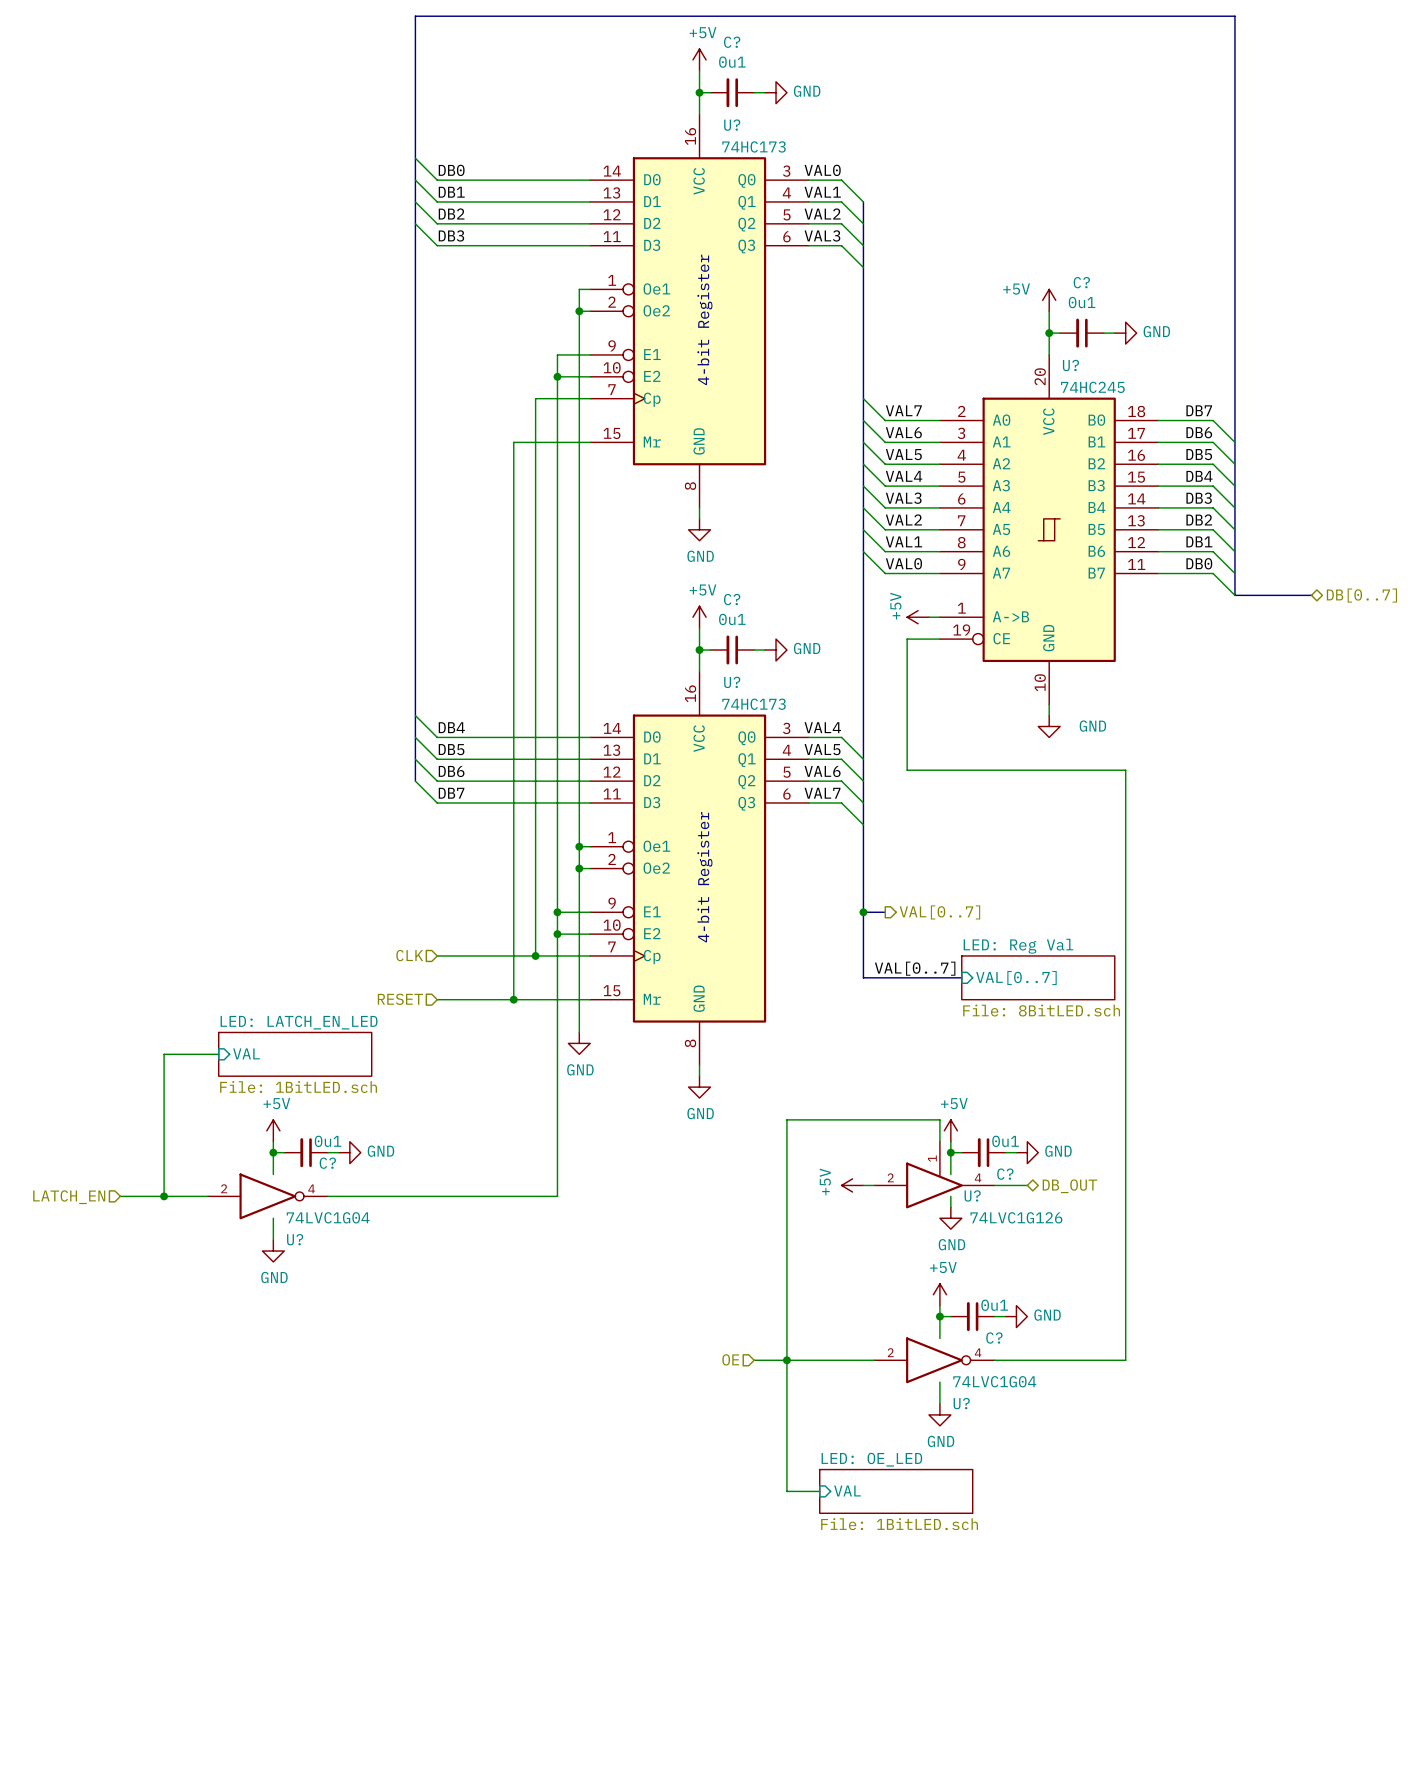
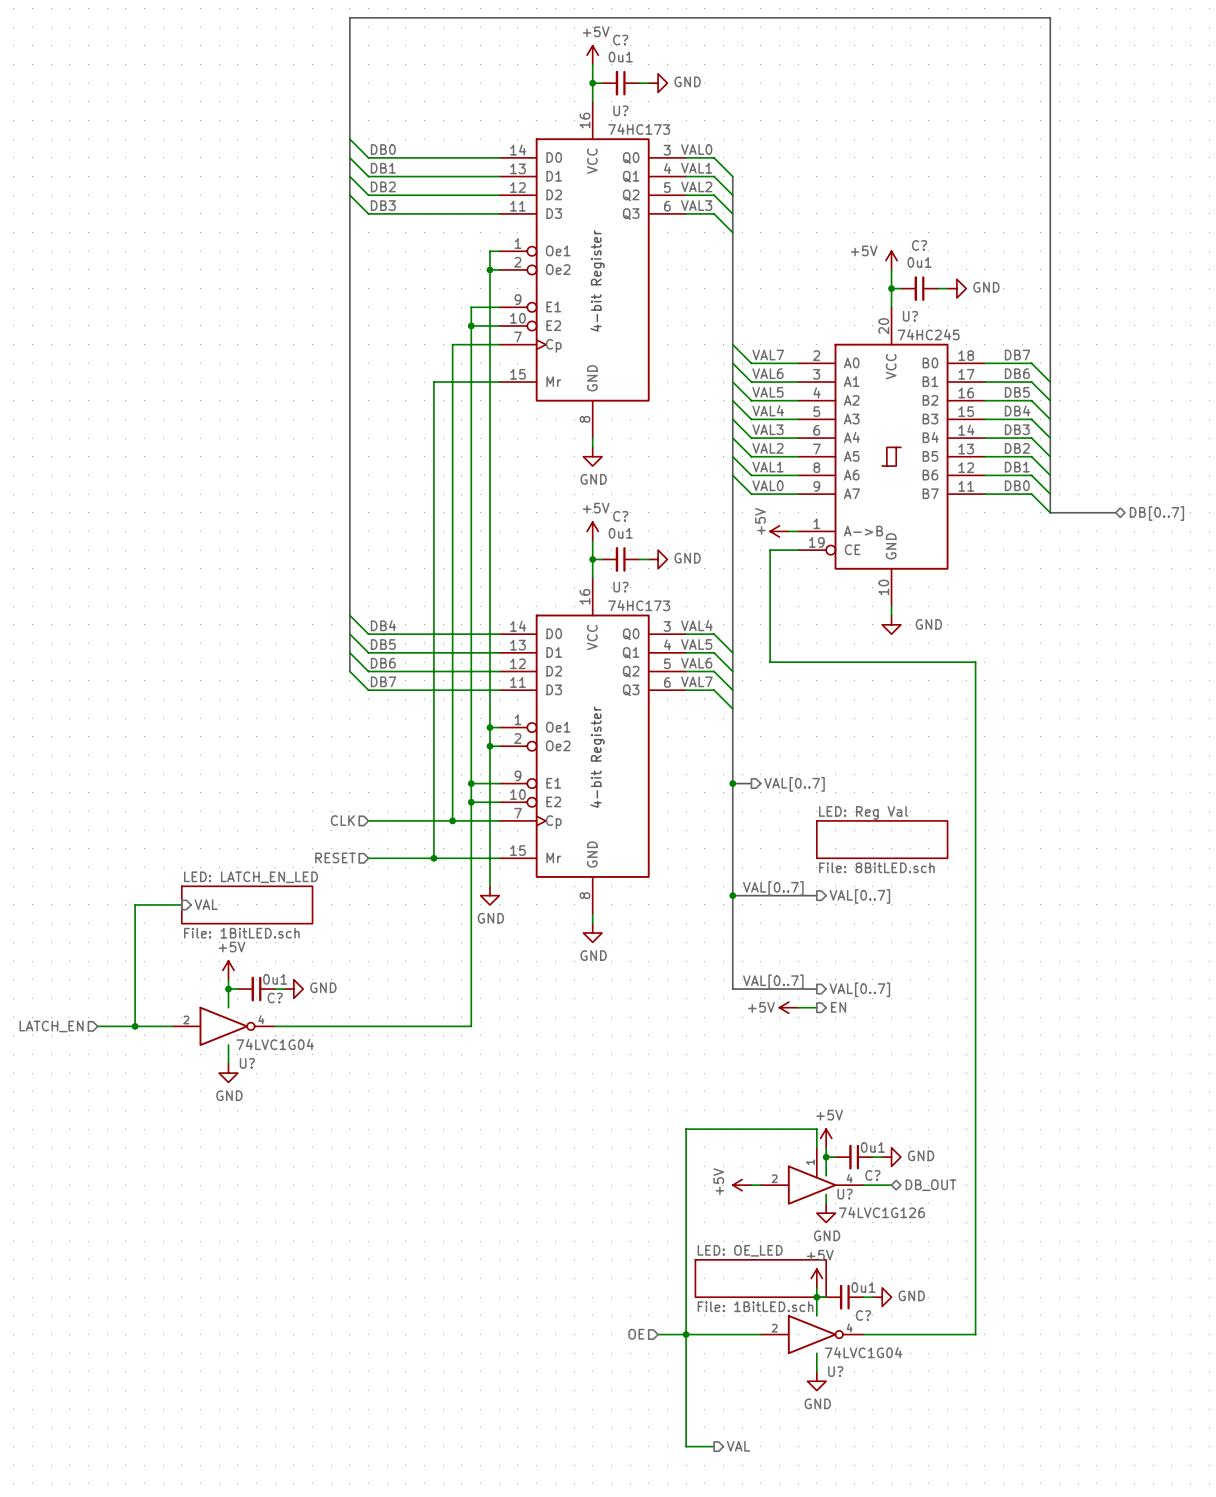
wire: (1125, 770) (1125, 1360) (994, 1360) -> (956, 662) (975, 662) (975, 1334) (863, 1334)
label position: VAL[0..7] (915, 968) -> VAL[0..7] (773, 888)
bus: (863, 977) (961, 977) -> (732, 839) (732, 989) (816, 989)
sheet pin position: VAL[0..7] (1016, 978) -> VAL[0..7] (859, 896)
bus: none -> (732, 895) (816, 895)
junction: none -> (732, 895)
power symbol: +5V (950, 1130) -> none
wire: (939, 1141) (939, 1119) (786, 1119) (786, 1491) (819, 1491) -> none
wire: (950, 1141) (950, 1174) -> (826, 1147) (826, 1175)
label: none -> VAL[0..7] (773, 981)
junction: (950, 1152) -> none
C?: 0u1 (983, 1152) -> none
wire: (1005, 1152) (1016, 1152) -> (872, 1157) (882, 1157)
sheet pin: none -> VAL[0..7] (859, 989)
power symbol: GND (1027, 1152) -> none
power symbol: none -> +5V (788, 1007)
wire: none -> (798, 1007) (816, 1007)
sheet pin: none -> EN (838, 1007)
U? position: (934, 1175) -> (812, 1176)
power symbol: +5V (852, 1185) -> none
wire: (863, 1185) (874, 1185) -> (751, 1185) (760, 1185)
wire: (994, 1185) (1027, 1185) -> (863, 1185) (891, 1185)
hierarchical label position: DB_OUT (1069, 1186) -> DB_OUT (931, 1185)
wire: (950, 1196) (950, 1207) -> (826, 1194) (826, 1203)
power symbol: GND (950, 1218) -> none
power symbol position: +5V (939, 1294) -> +5V (826, 1138)
wire: (939, 1305) (939, 1338) -> (816, 1287) (816, 1315)
wire: none -> (798, 1129) (686, 1129) (686, 1446) (714, 1446)
junction position: (939, 1316) -> (826, 1157)
wire: none -> (807, 1129) (816, 1129) (816, 1147)
C? position: (972, 1316) -> (854, 1157)
wire: (994, 1316) (1005, 1316) -> (863, 1297) (872, 1297)
power symbol position: GND (1016, 1316) -> GND (891, 1157)
hierarchical label position: OE (730, 1359) -> OE (636, 1334)
wire: (754, 1360) (874, 1360) -> (658, 1334) (760, 1334)
junction: (786, 1360) -> none
U? position: (934, 1360) -> (812, 1334)
power symbol: none -> +5V (742, 1185)
wire: (939, 1382) (939, 1404) -> (816, 1353) (816, 1371)
power symbol position: GND (939, 1414) -> GND (826, 1213)
sheet pin position: VAL (847, 1491) -> VAL (738, 1446)
power symbol: none -> +5V (816, 1278)
junction: none -> (816, 1297)
C?: none -> 0u1 (844, 1297)
power symbol: none -> GND (882, 1297)
junction: none -> (686, 1334)
power symbol: none -> GND (816, 1381)

